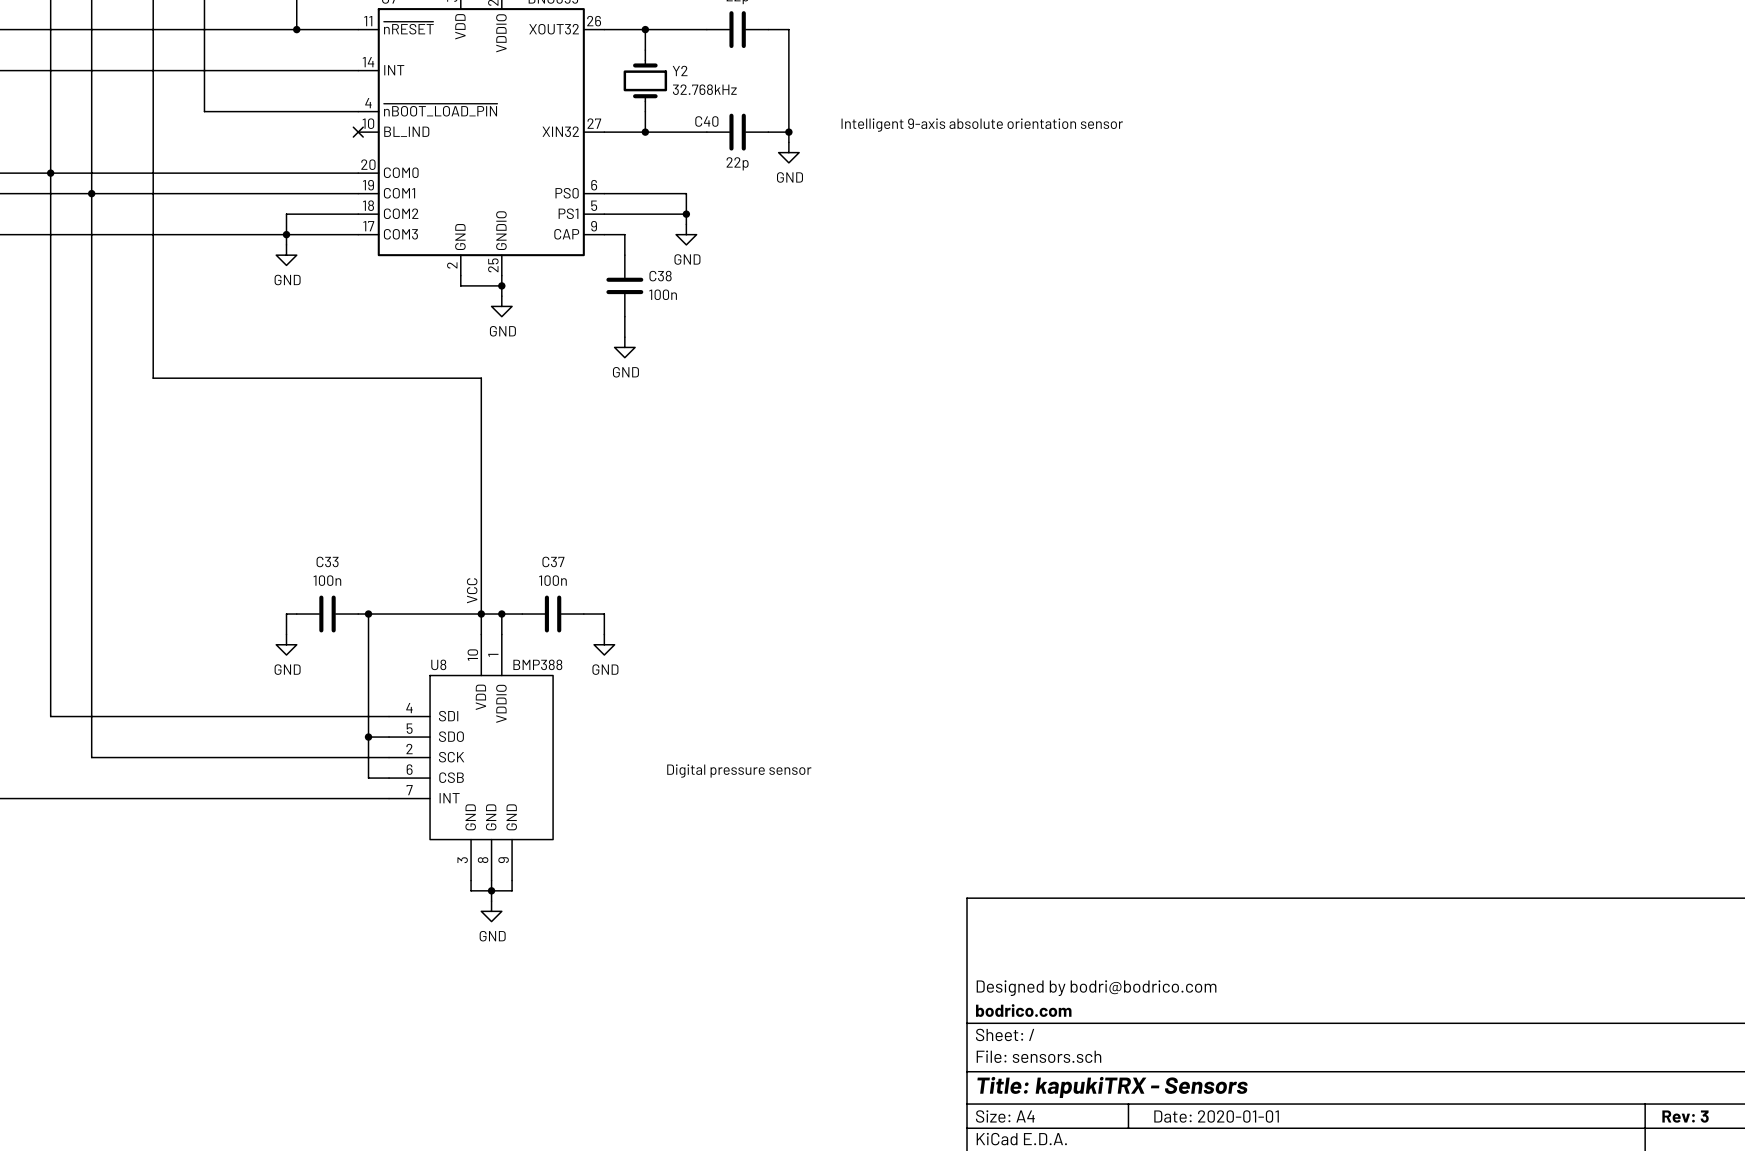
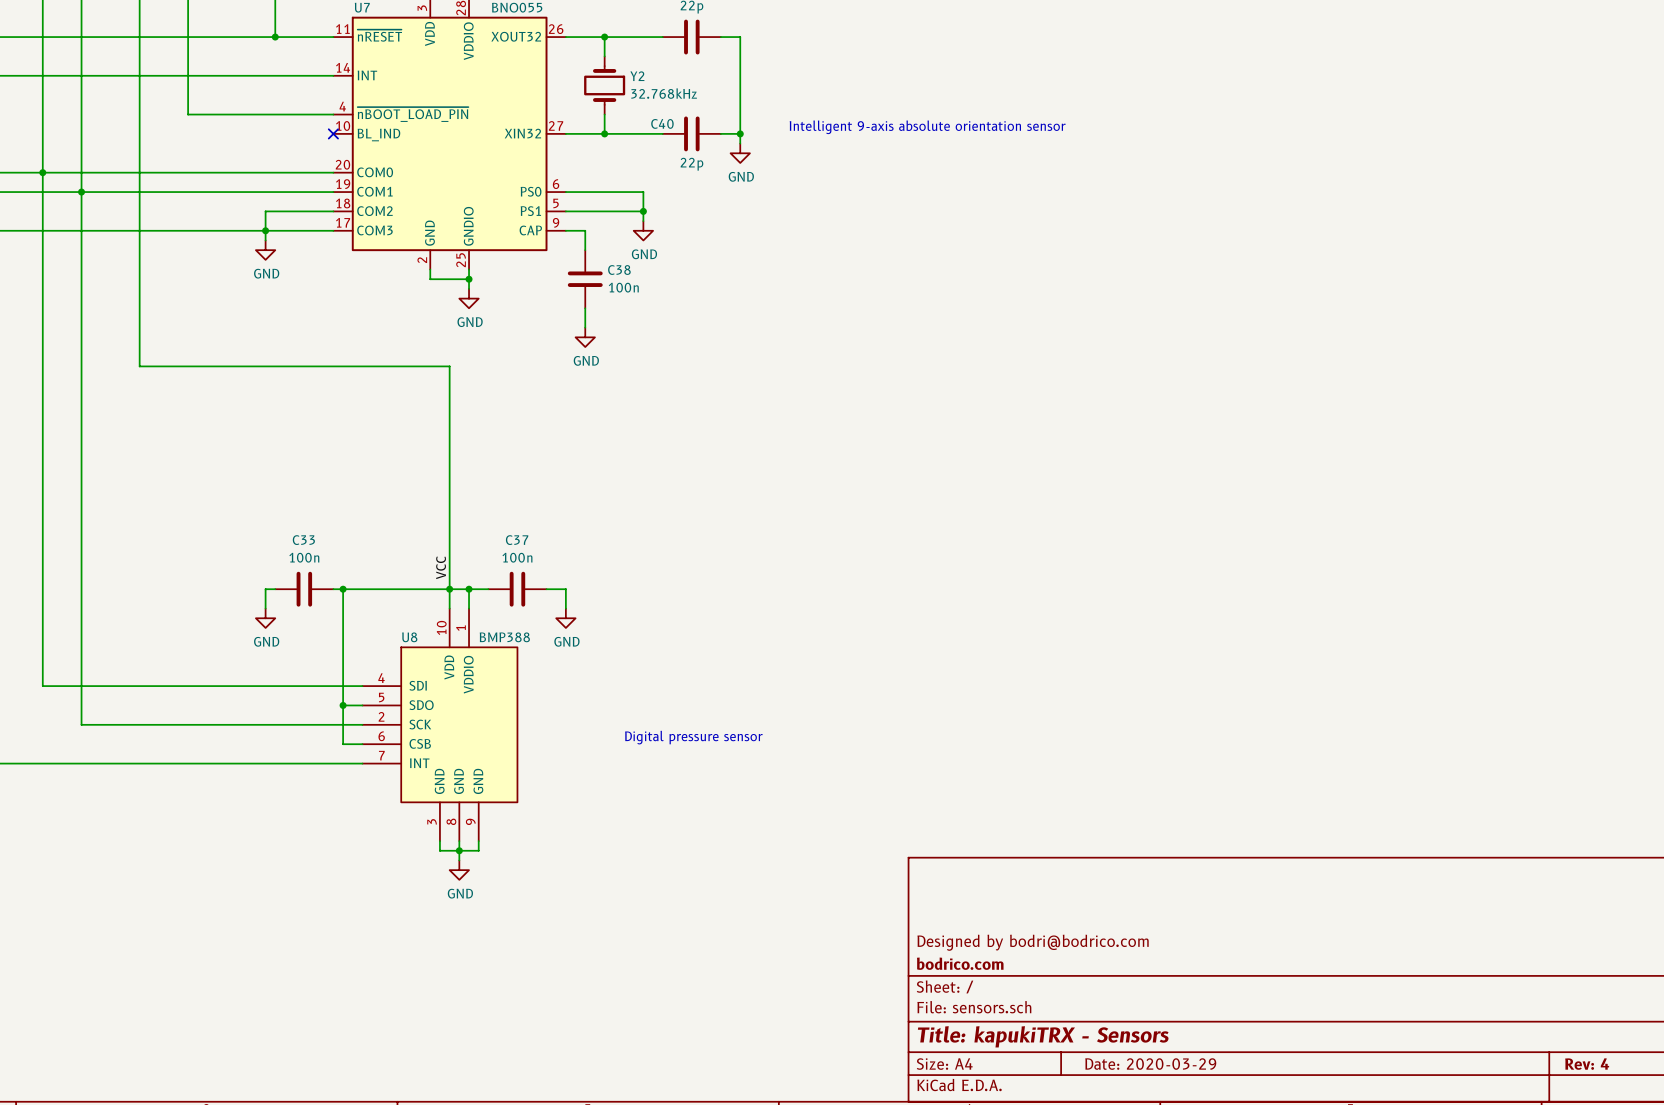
title block: Date: 2020-01-01 (1216, 1116) -> Date: 2020-03-29 (1150, 1064)
title block: Rev: 3 (1685, 1116) -> Rev: 4 (1587, 1064)

